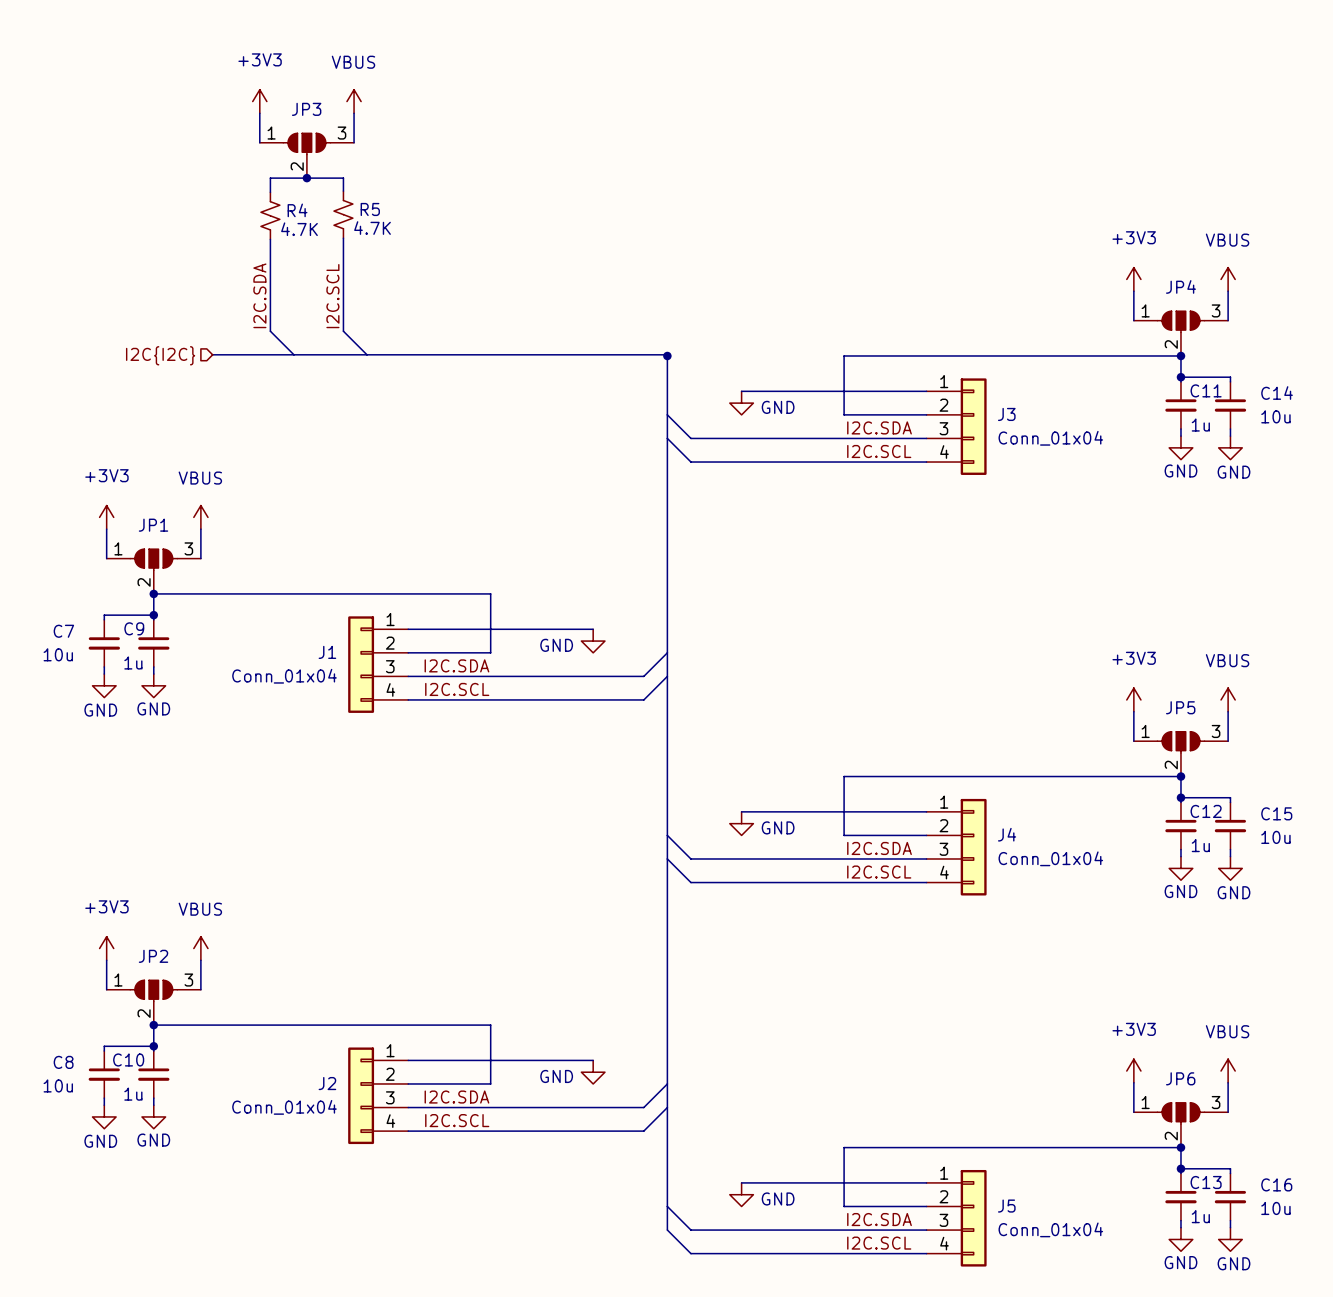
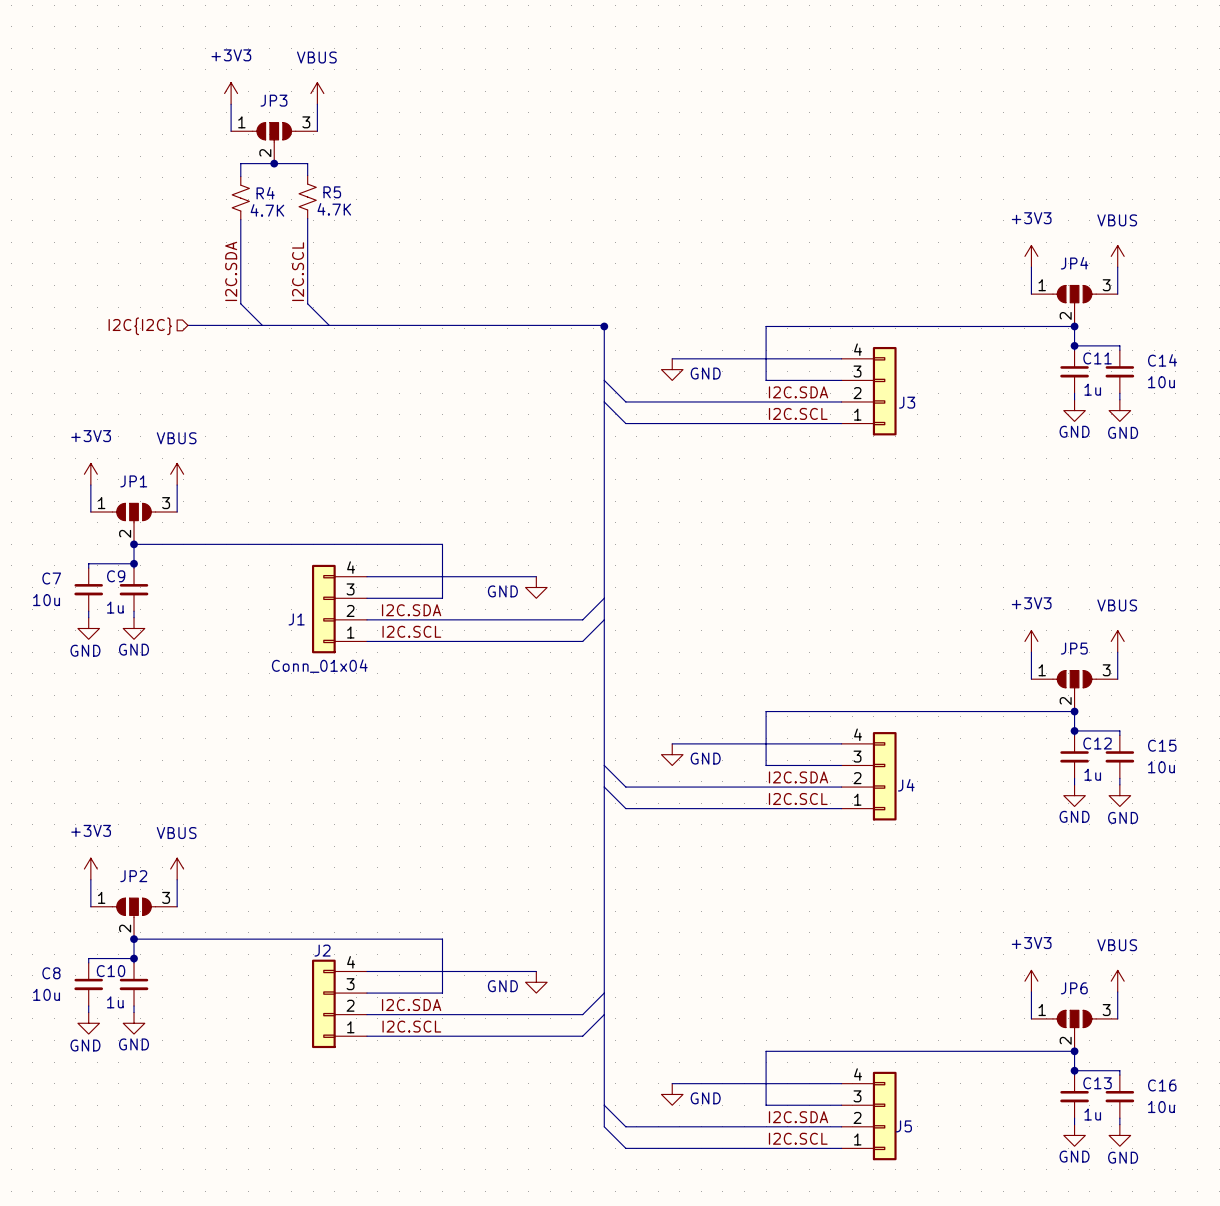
J3 flip: as is (973, 426) -> up-down (884, 391)
J3 value: Conn_01x04 (1050, 438) -> none
J1 flip: as is (361, 664) -> up-down (323, 609)
J1 value position: Conn_01x04 (284, 676) -> Conn_01x04 (319, 666)
J4 flip: as is (973, 847) -> up-down (884, 776)
J4 value: Conn_01x04 (1050, 858) -> none
J2 name position: J2 (327, 1083) -> J2 (322, 950)
J2 flip: as is (361, 1095) -> up-down (323, 1003)
J2 value: Conn_01x04 (284, 1107) -> none
J5 flip: as is (973, 1218) -> up-down (884, 1116)
J5 value: Conn_01x04 (1050, 1229) -> none

